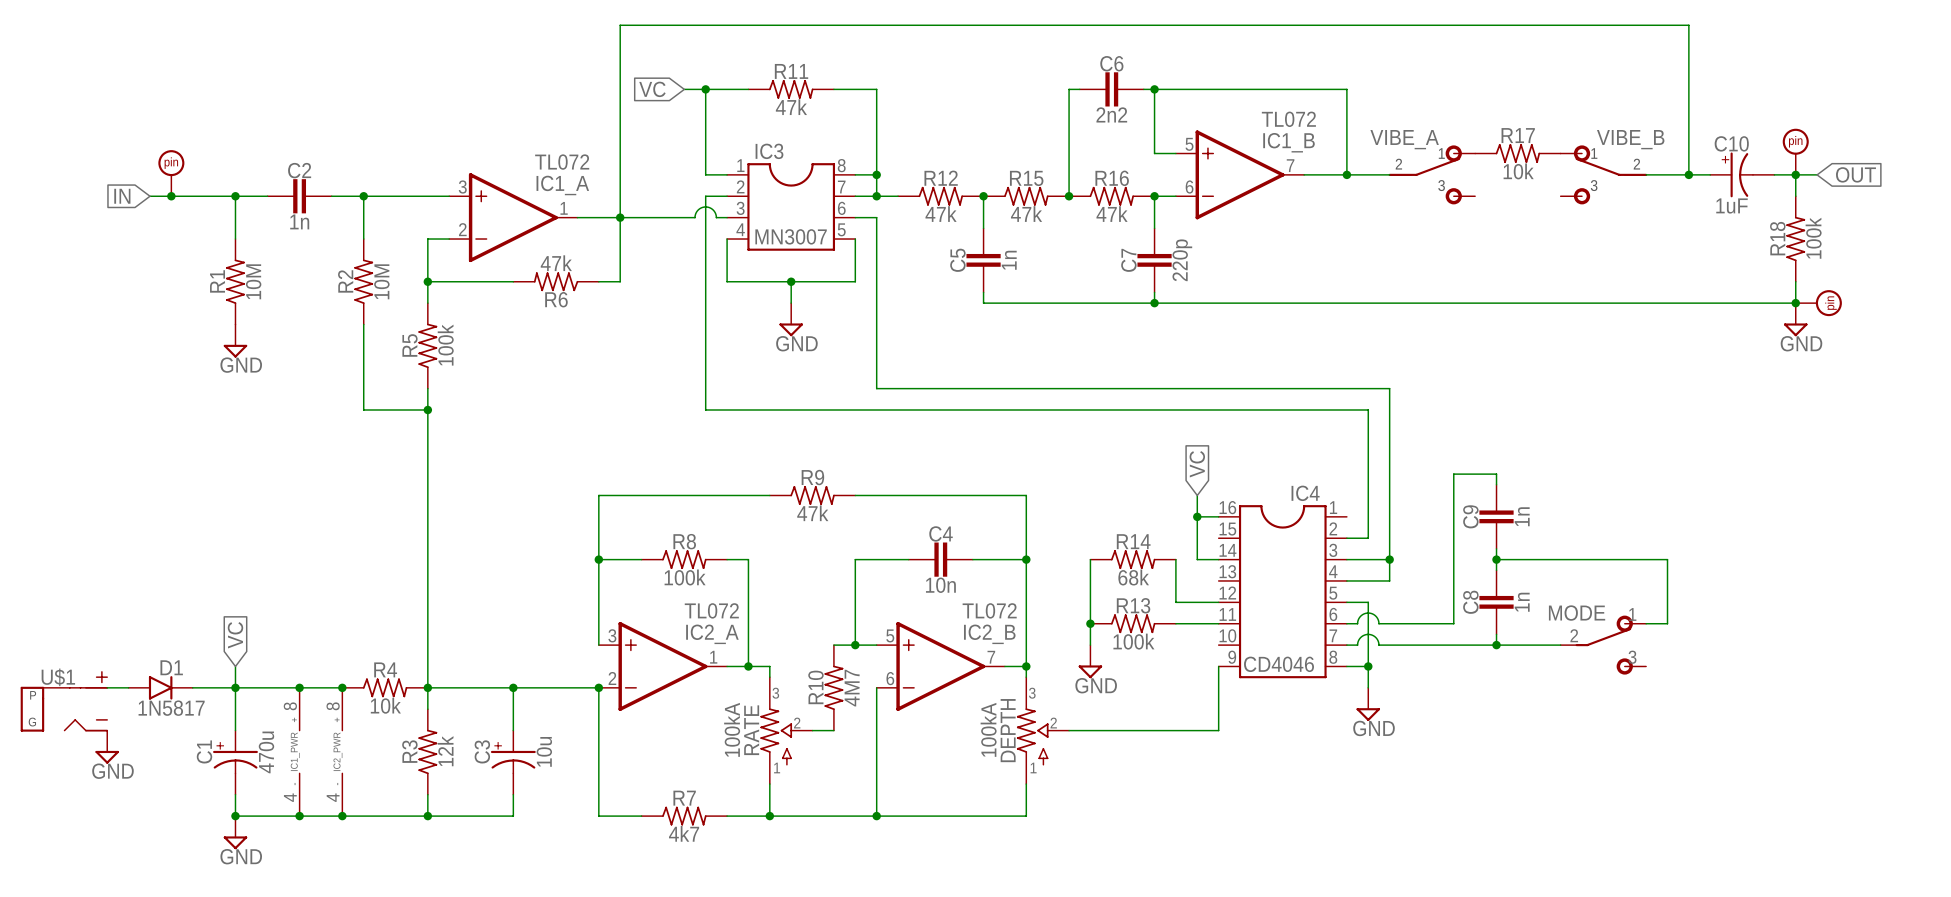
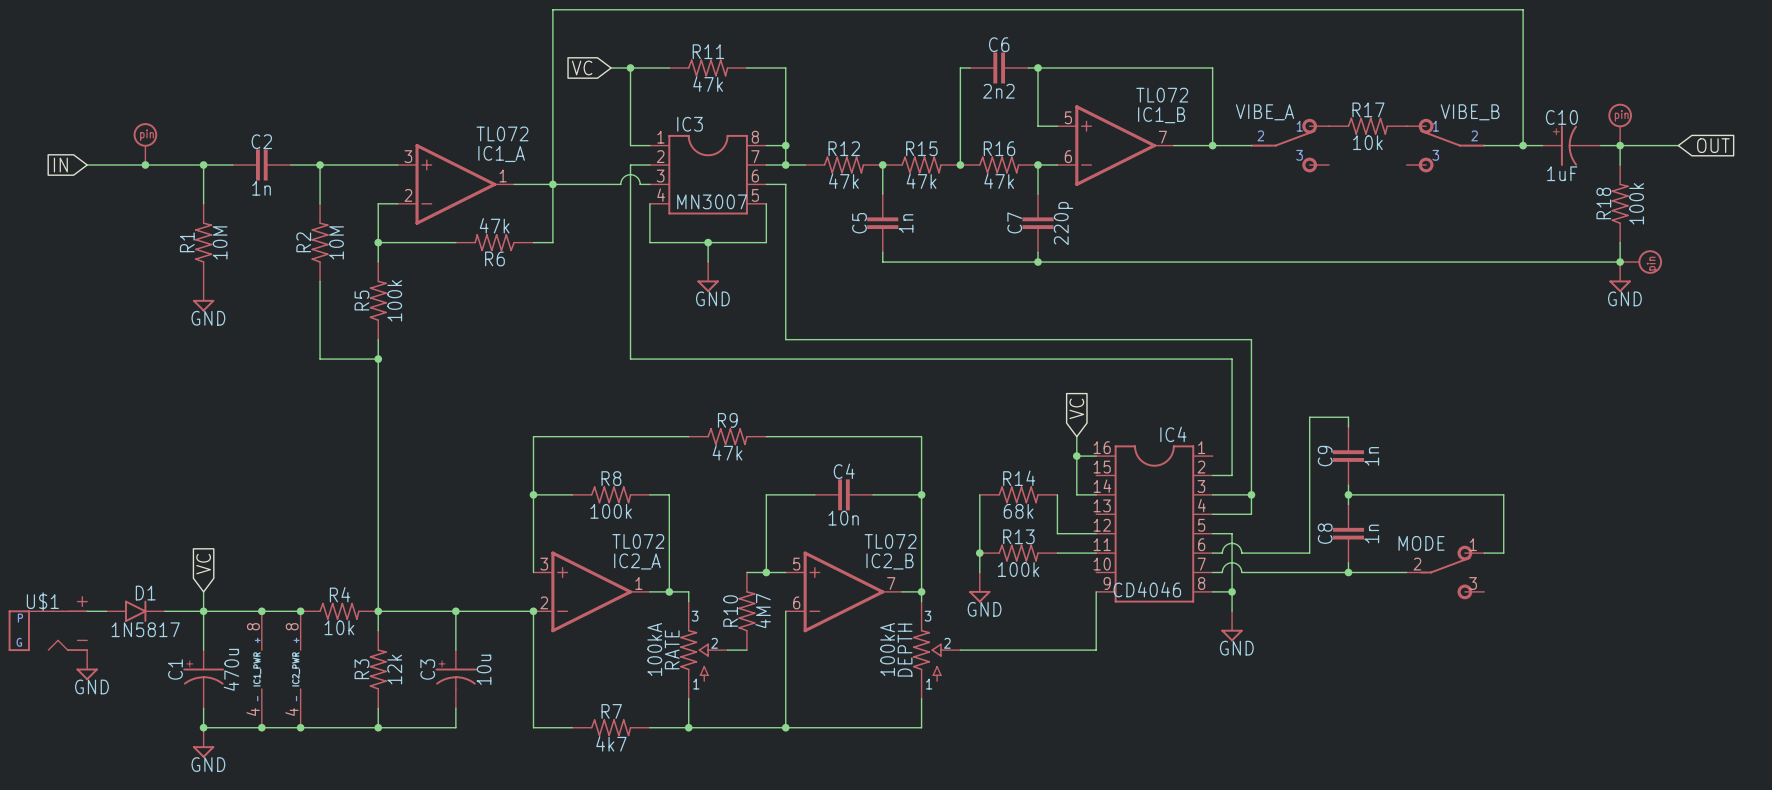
wire: none -> (1639, 145) (1678, 145)
global label position: OUT (1855, 174) -> OUT (1713, 145)
wire: none -> (87, 165) (125, 165)
global label position: IN (122, 196) -> IN (60, 165)

